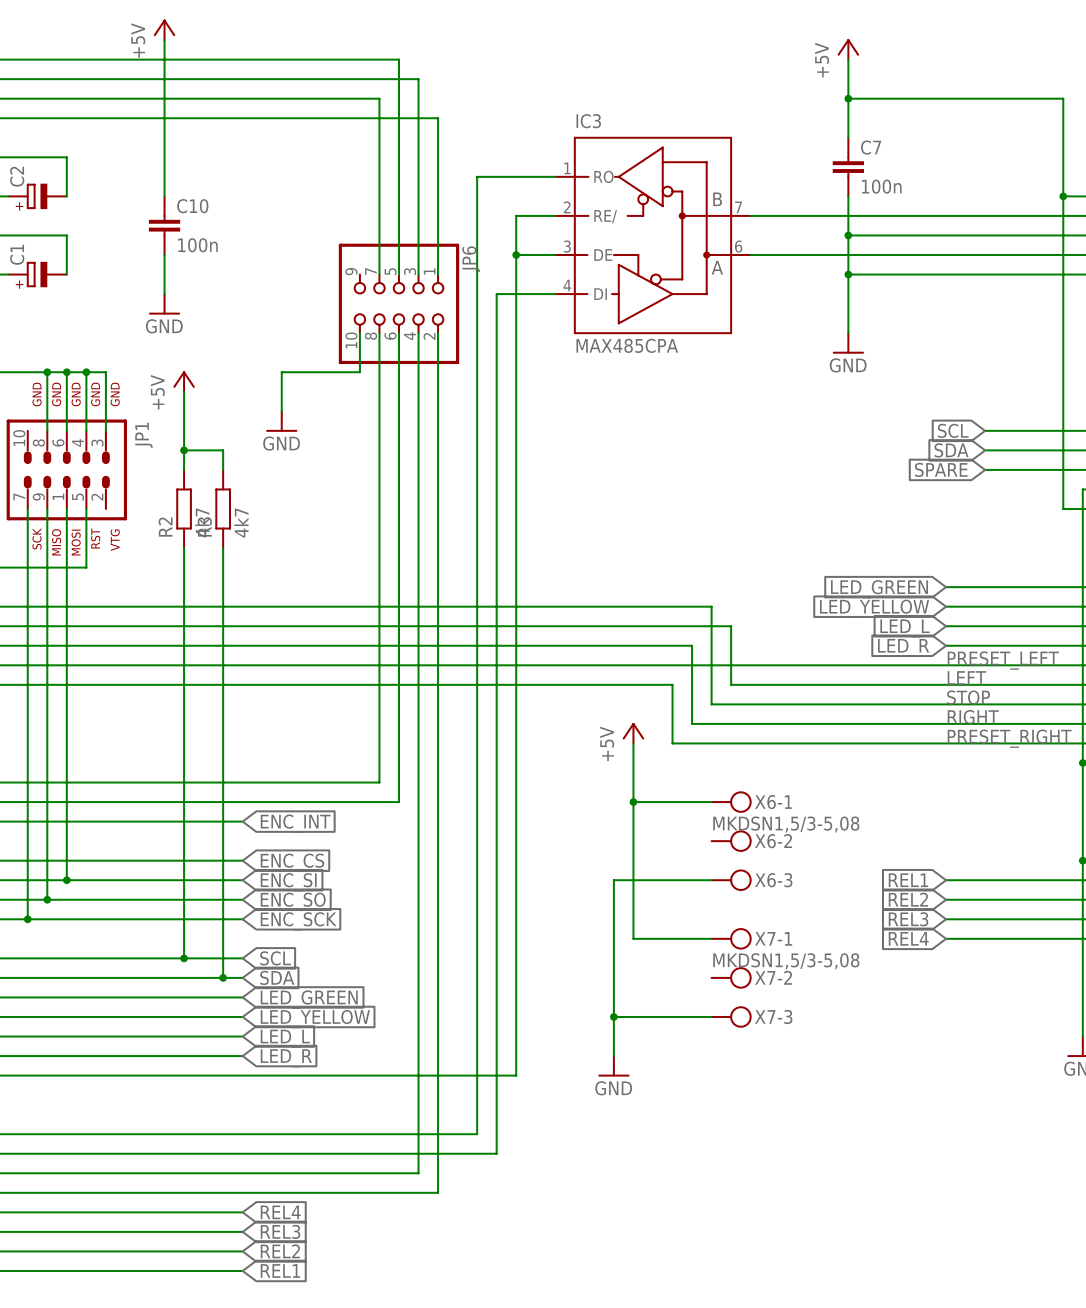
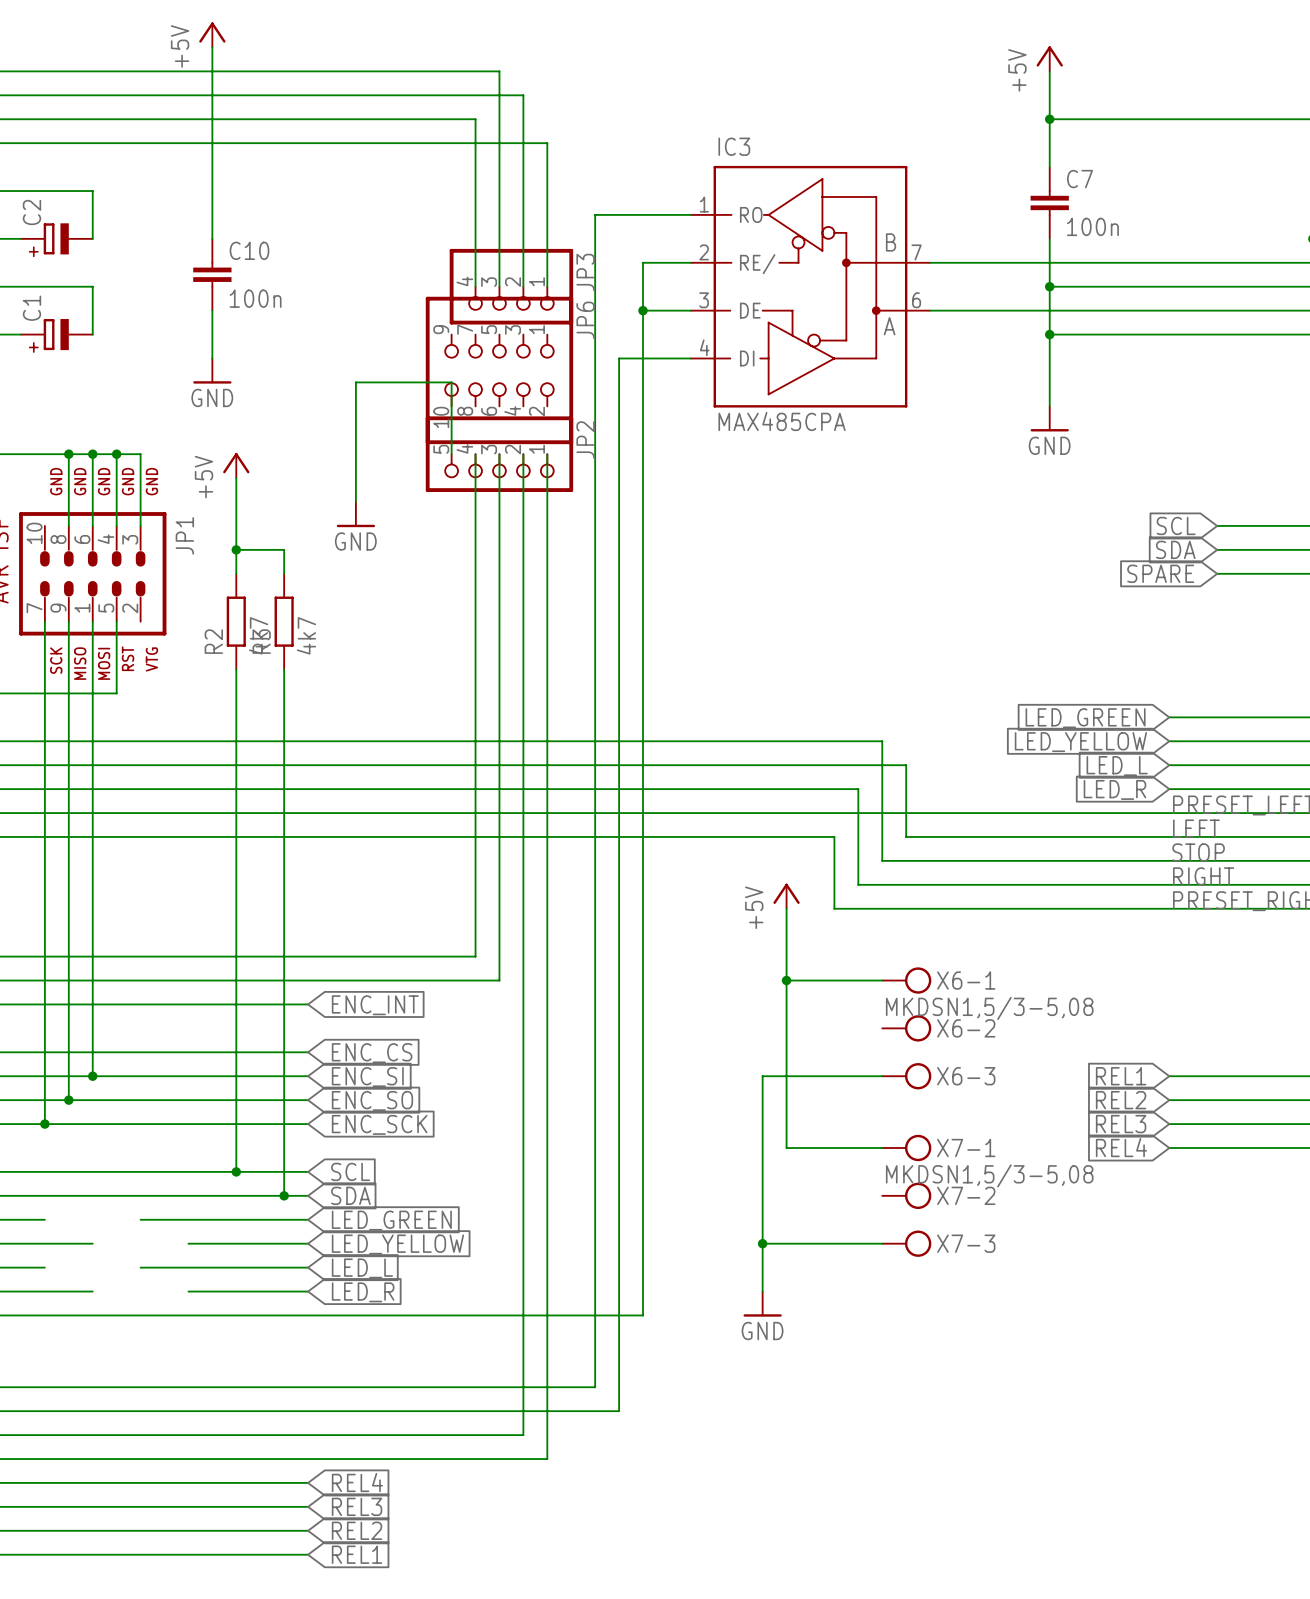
wire: (379, 235) (379, 274) -> none
wire: (398, 235) (398, 274) -> none
JP3: none -> (511, 286)
wire: (418, 235) (418, 274) -> none
wire: (438, 235) (438, 274) -> none
wire: (379, 333) (379, 372) -> none
wire: (398, 333) (398, 372) -> none
wire: (418, 333) (418, 372) -> none
wire: (438, 333) (438, 372) -> none
wire: (281, 372) (359, 372) -> (355, 454) (355, 382) (451, 382) (451, 406)
JP2: none -> (499, 454)
wire: (27, 997) (105, 997) -> none
wire: (66, 1016) (144, 1016) -> none
wire: (27, 1036) (105, 1036) -> none
wire: (66, 1056) (144, 1056) -> none

